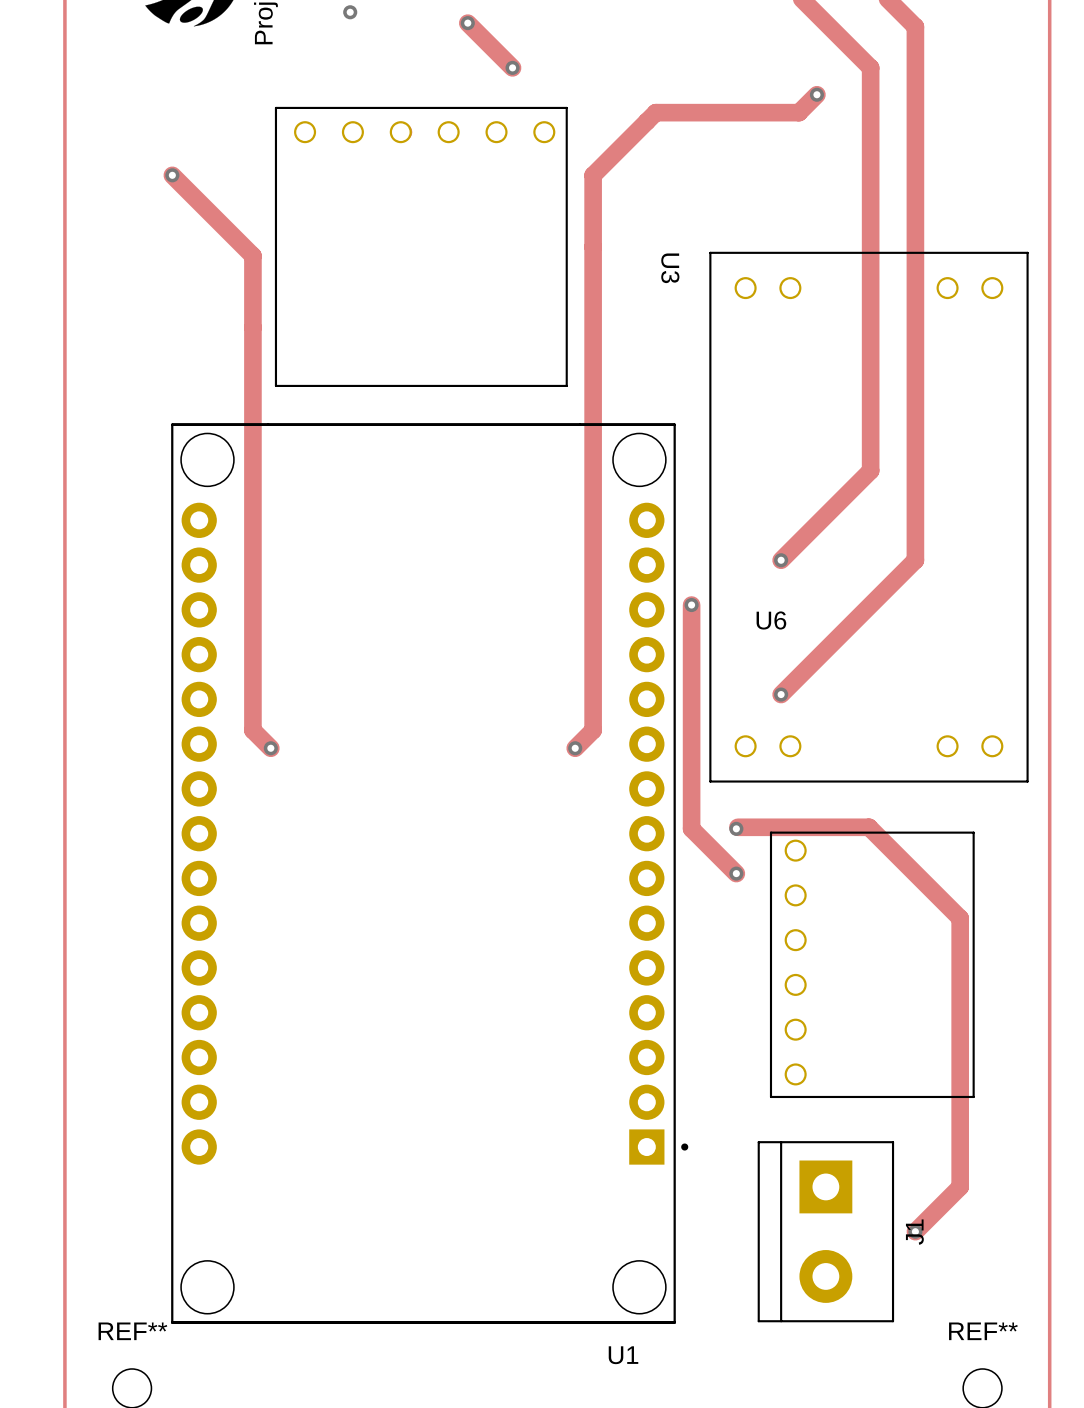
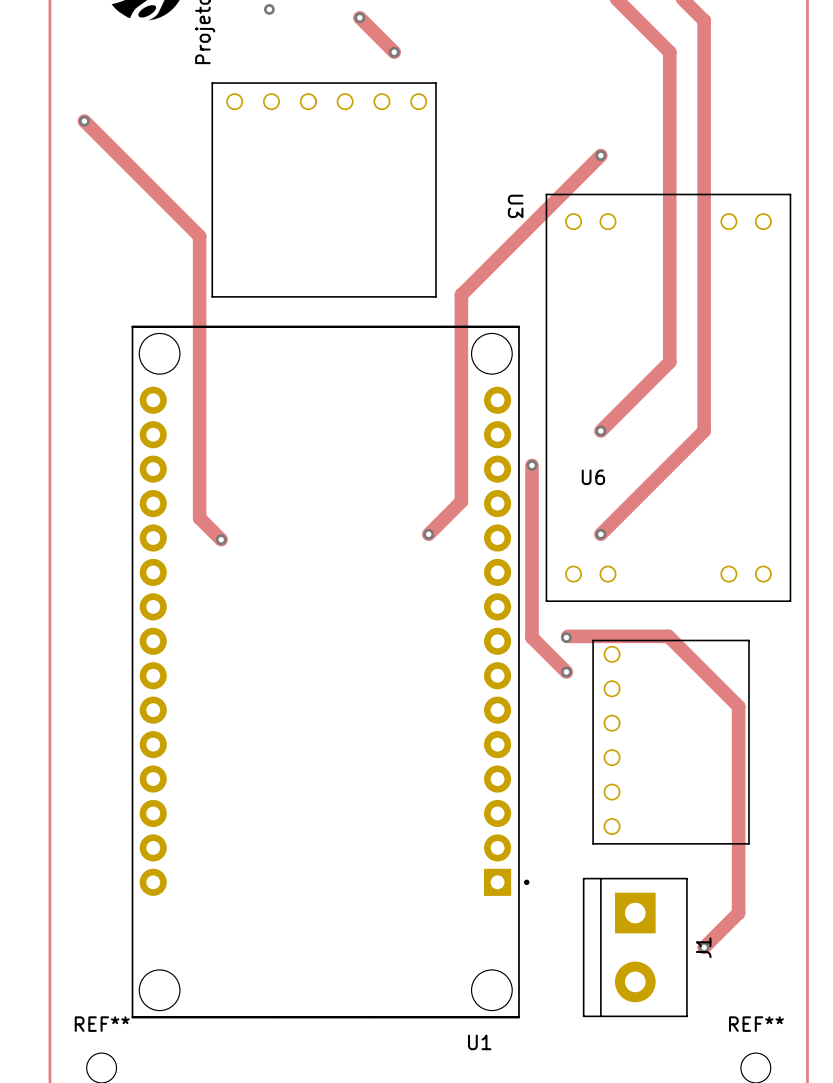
track: (816, 94) (799, 112) (655, 112) (593, 175) (593, 730) (575, 748) -> none
via: (816, 94) -> none
track: none -> (84, 121) (199, 236) (199, 518) (221, 539)
track: (172, 175) (252, 255) (252, 730) (270, 748) -> none
via position: (172, 175) -> (84, 121)
track: none -> (600, 155) (461, 295) (461, 501) (428, 534)
via: none -> (600, 155)
via position: (270, 748) -> (221, 539)
via position: (575, 748) -> (428, 534)

